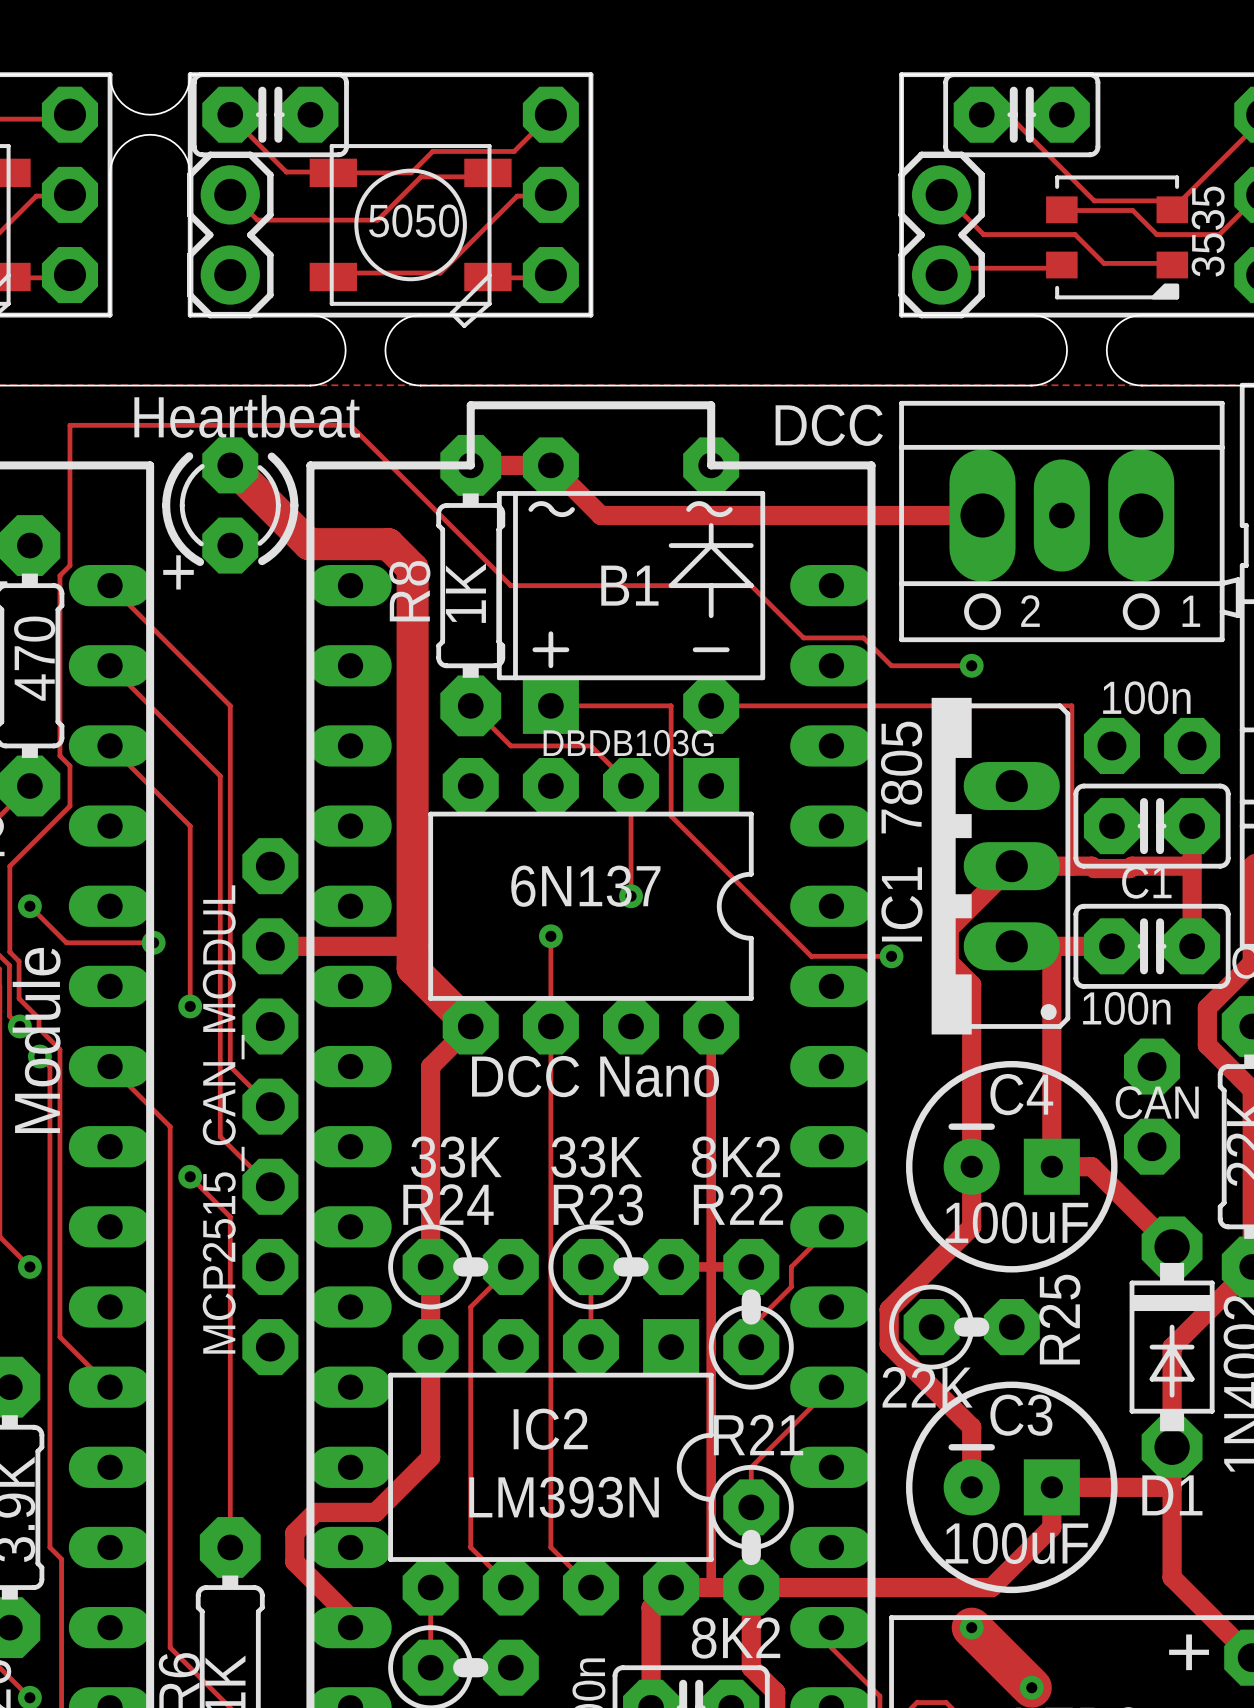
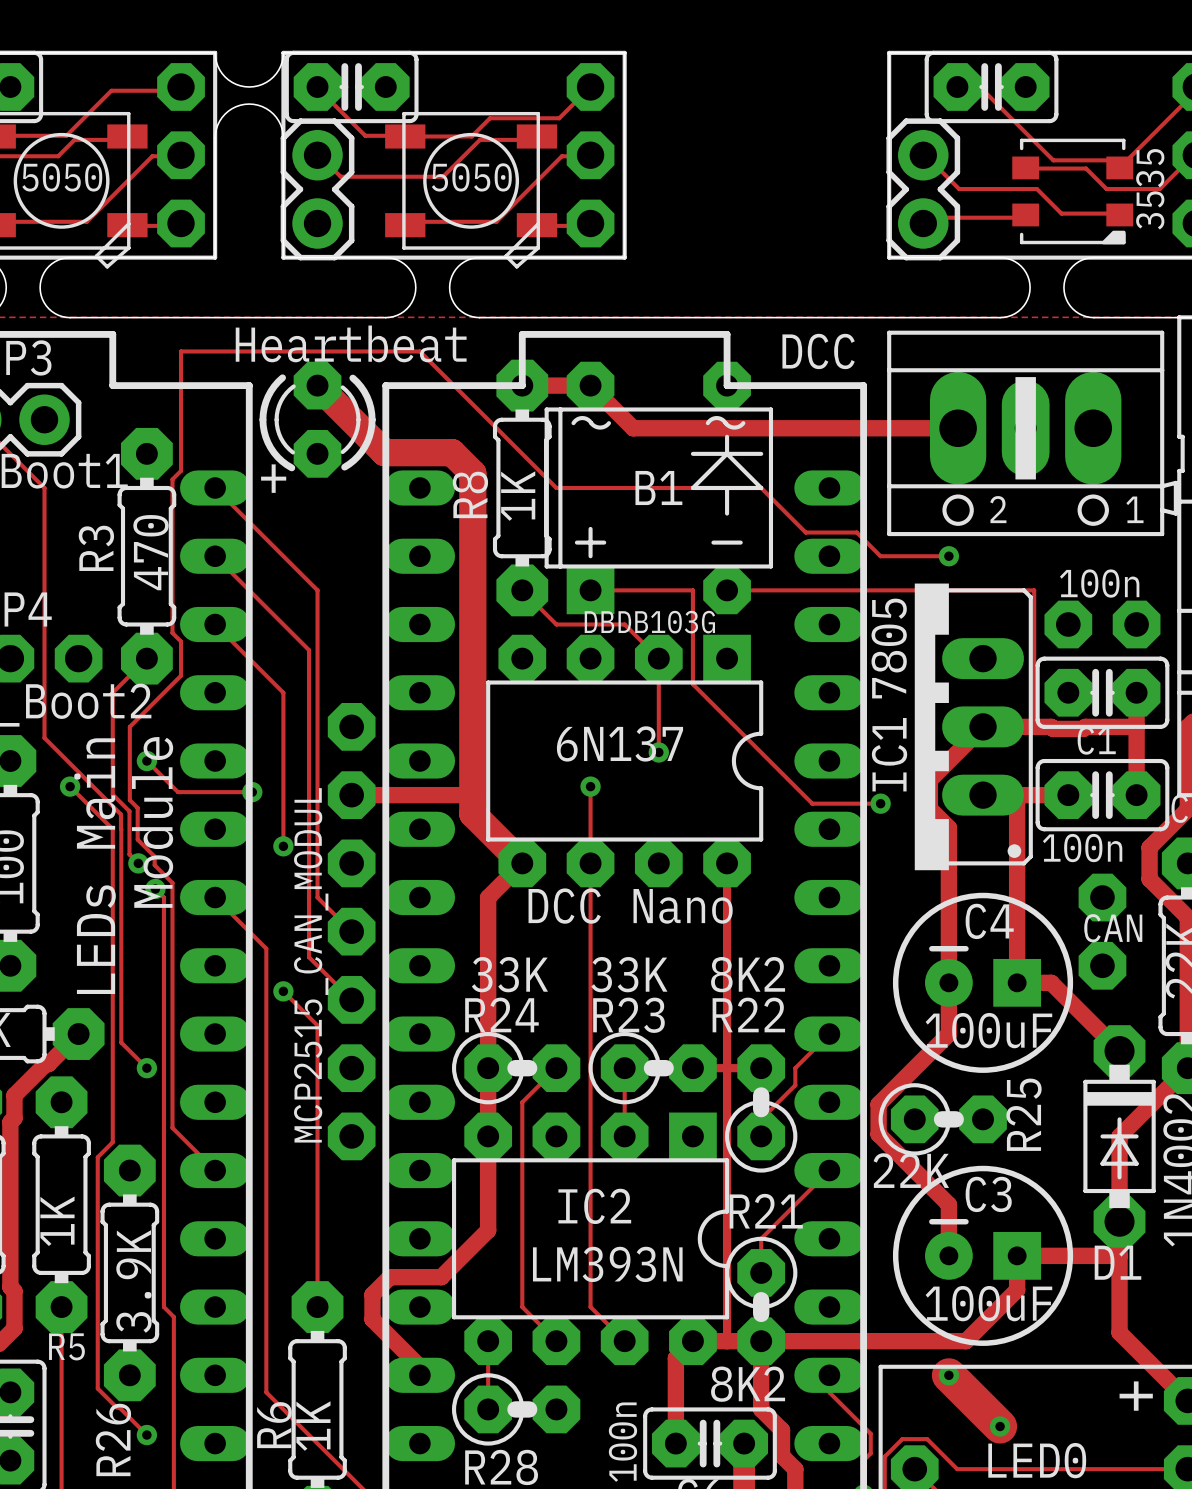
part footprint: [899, 400, 1241, 643] -> [887, 330, 1178, 537]

